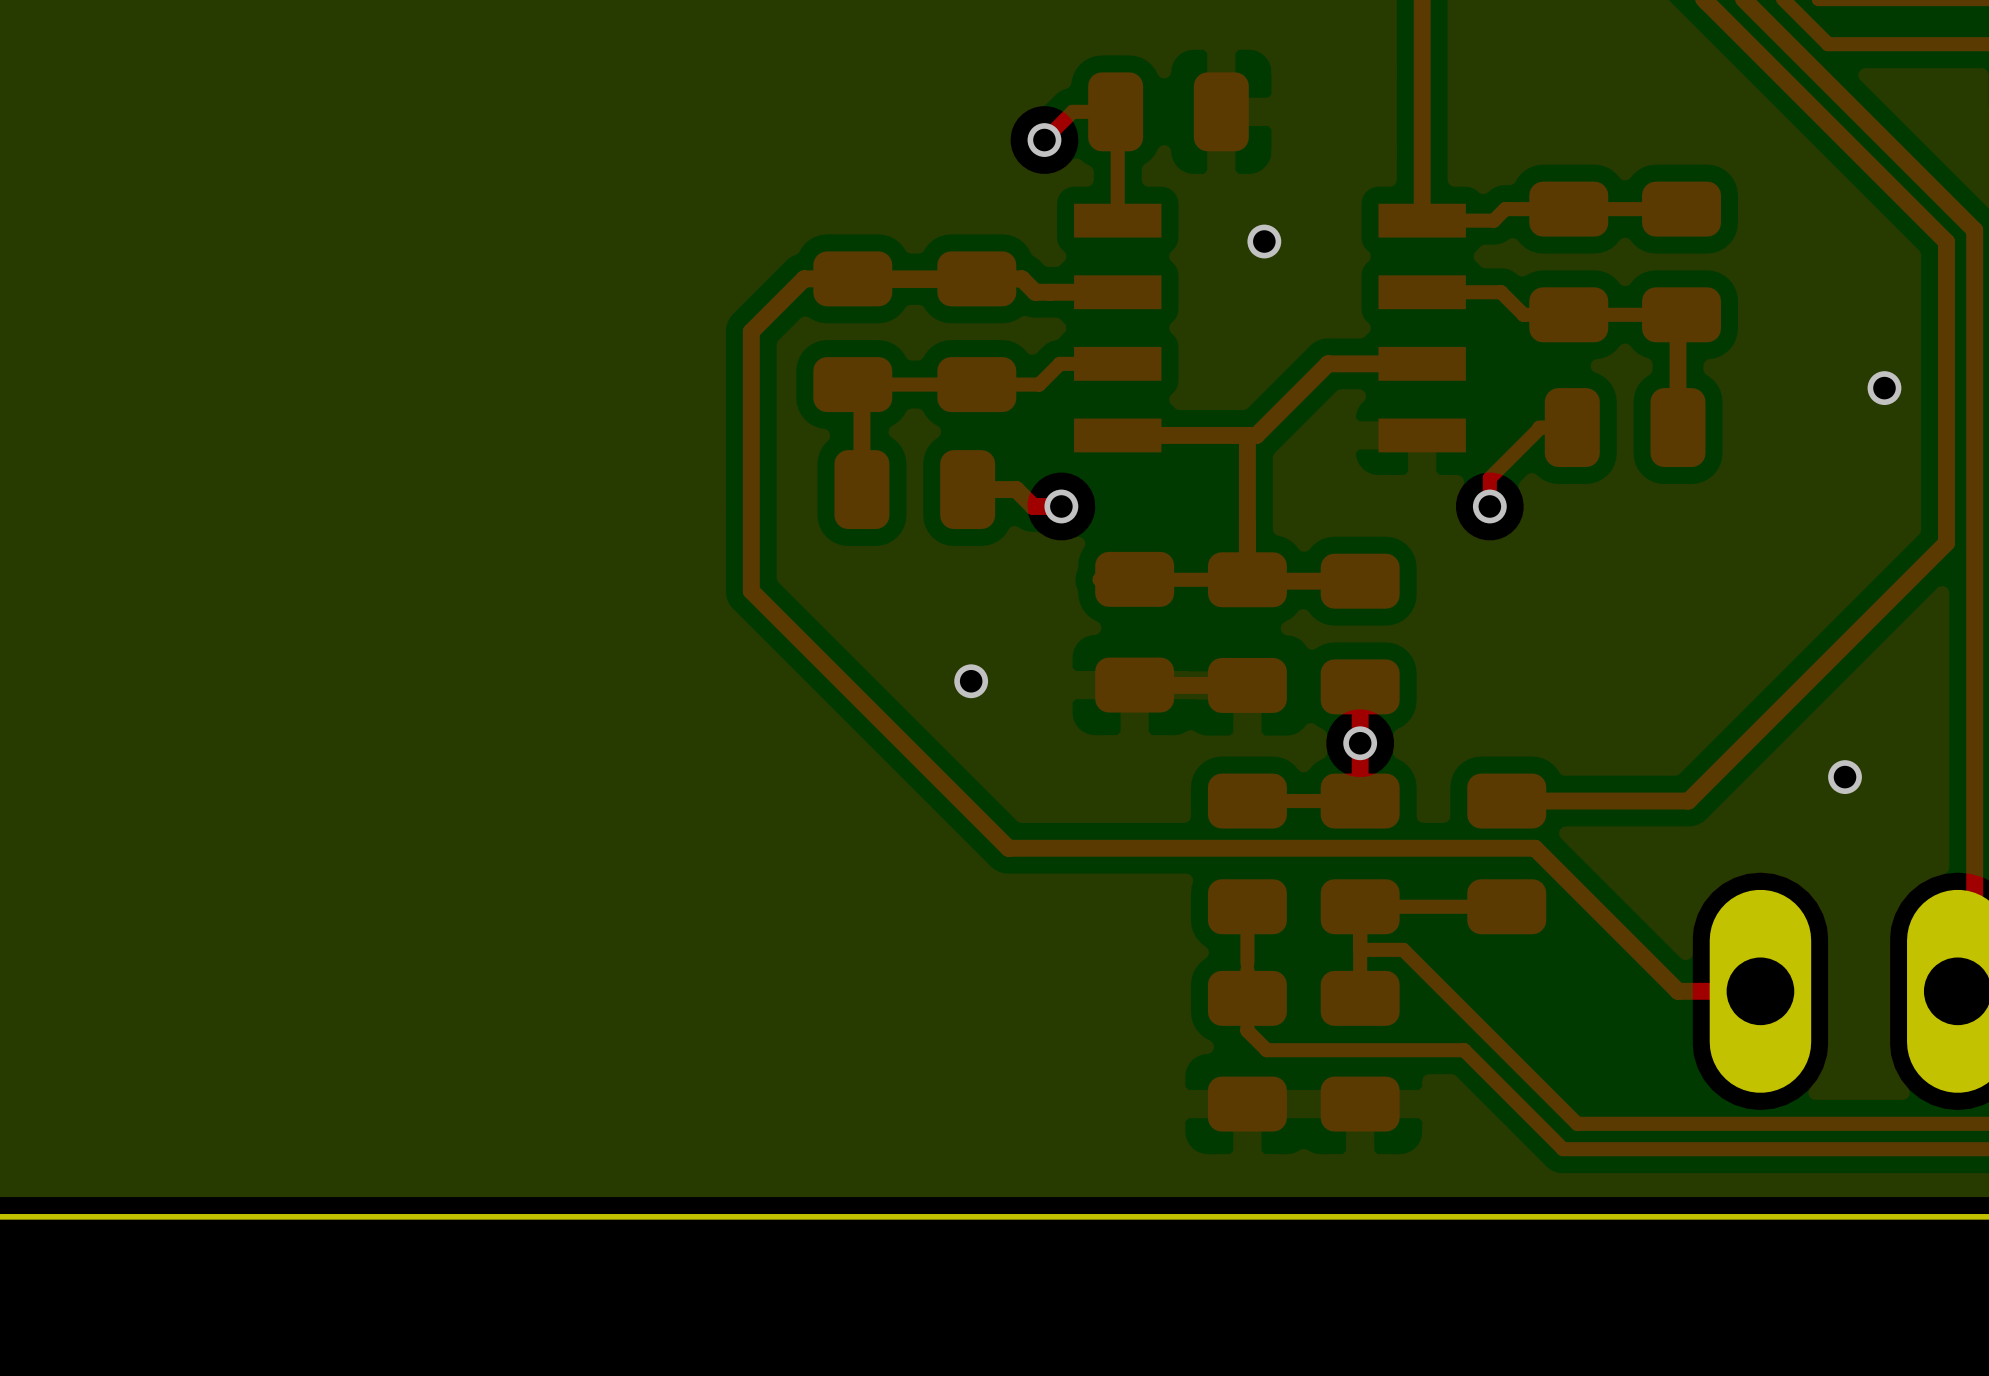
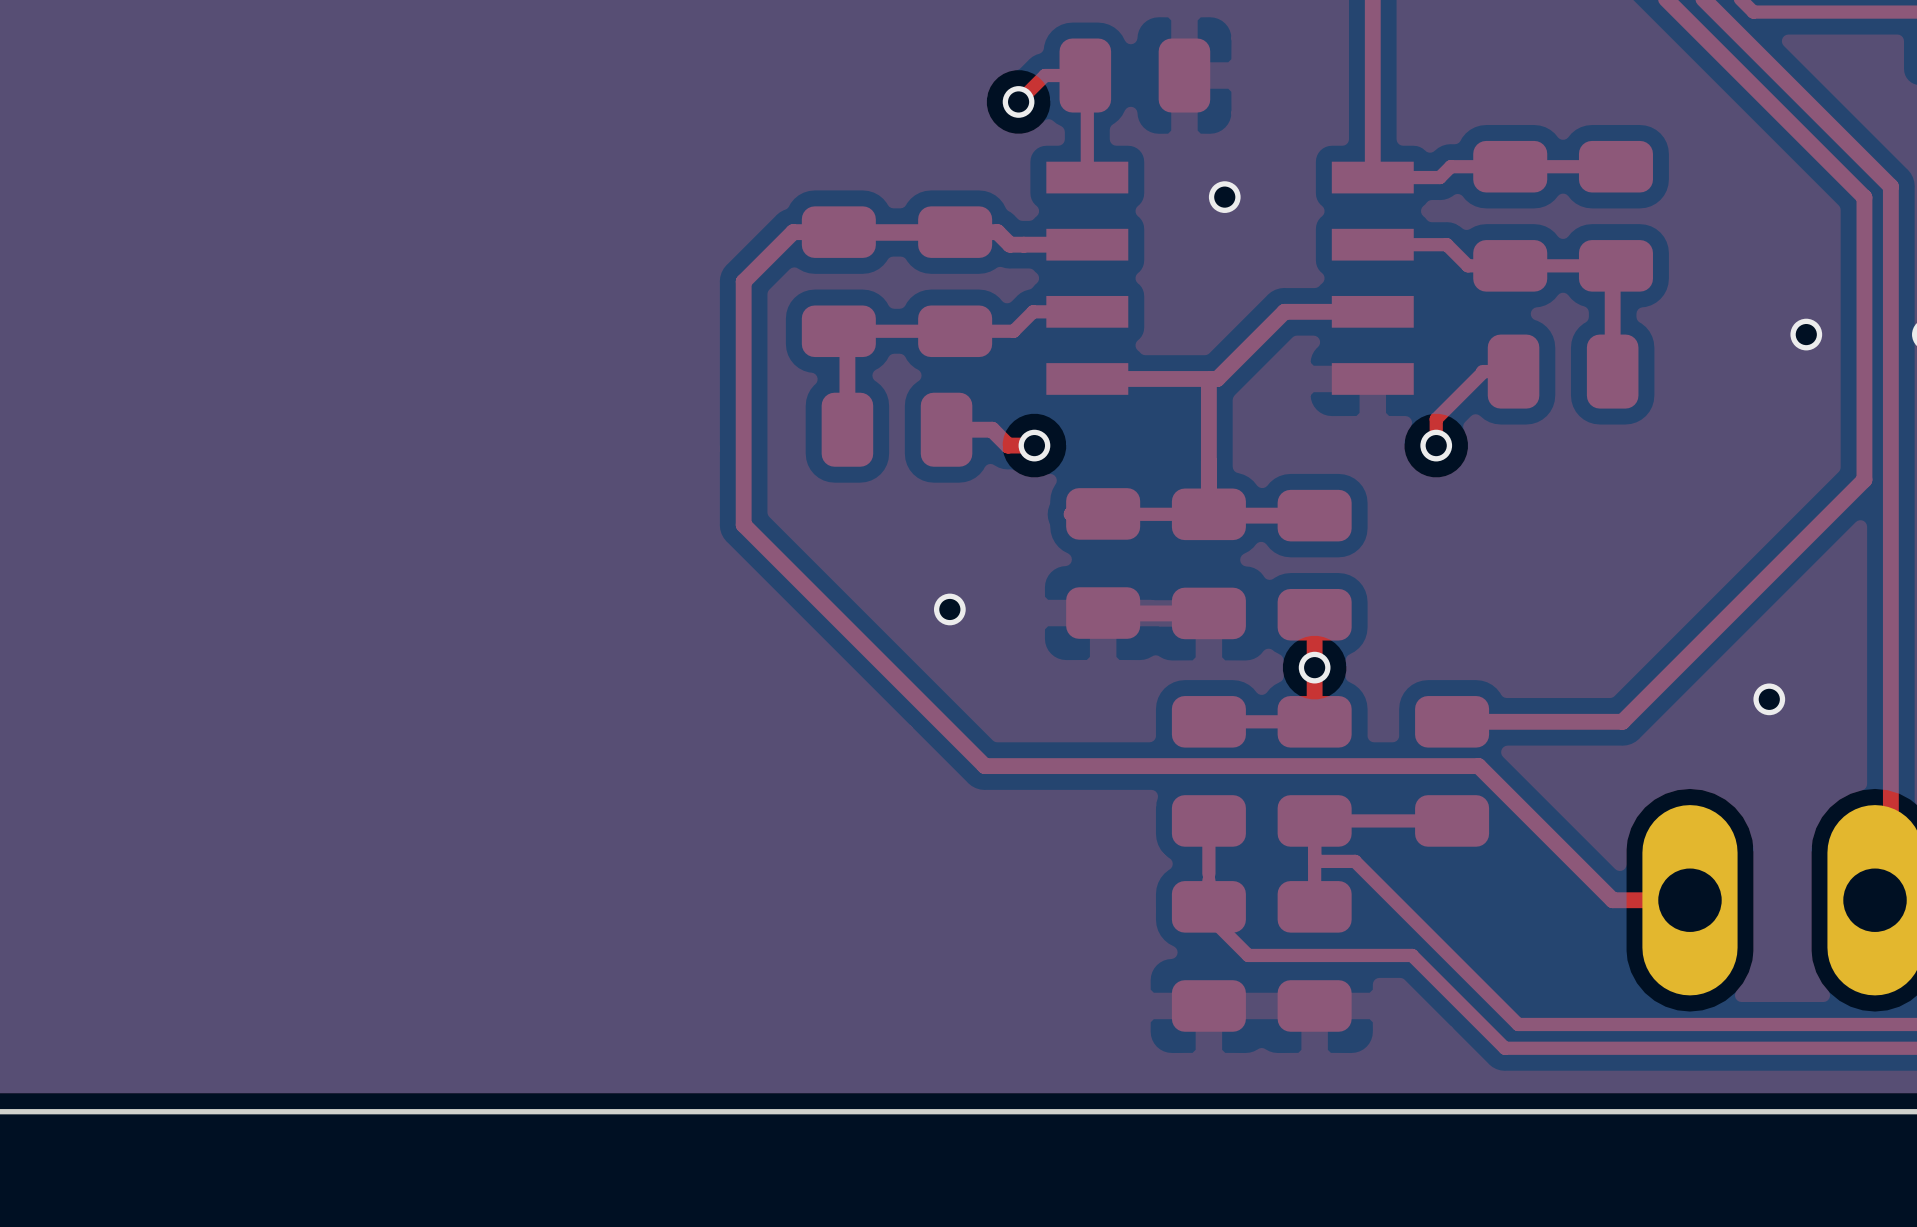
top track: (1247, 1008) (1247, 1030) (1266, 1050) (1289, 1050) -> (1208, 916) (1248, 955)

